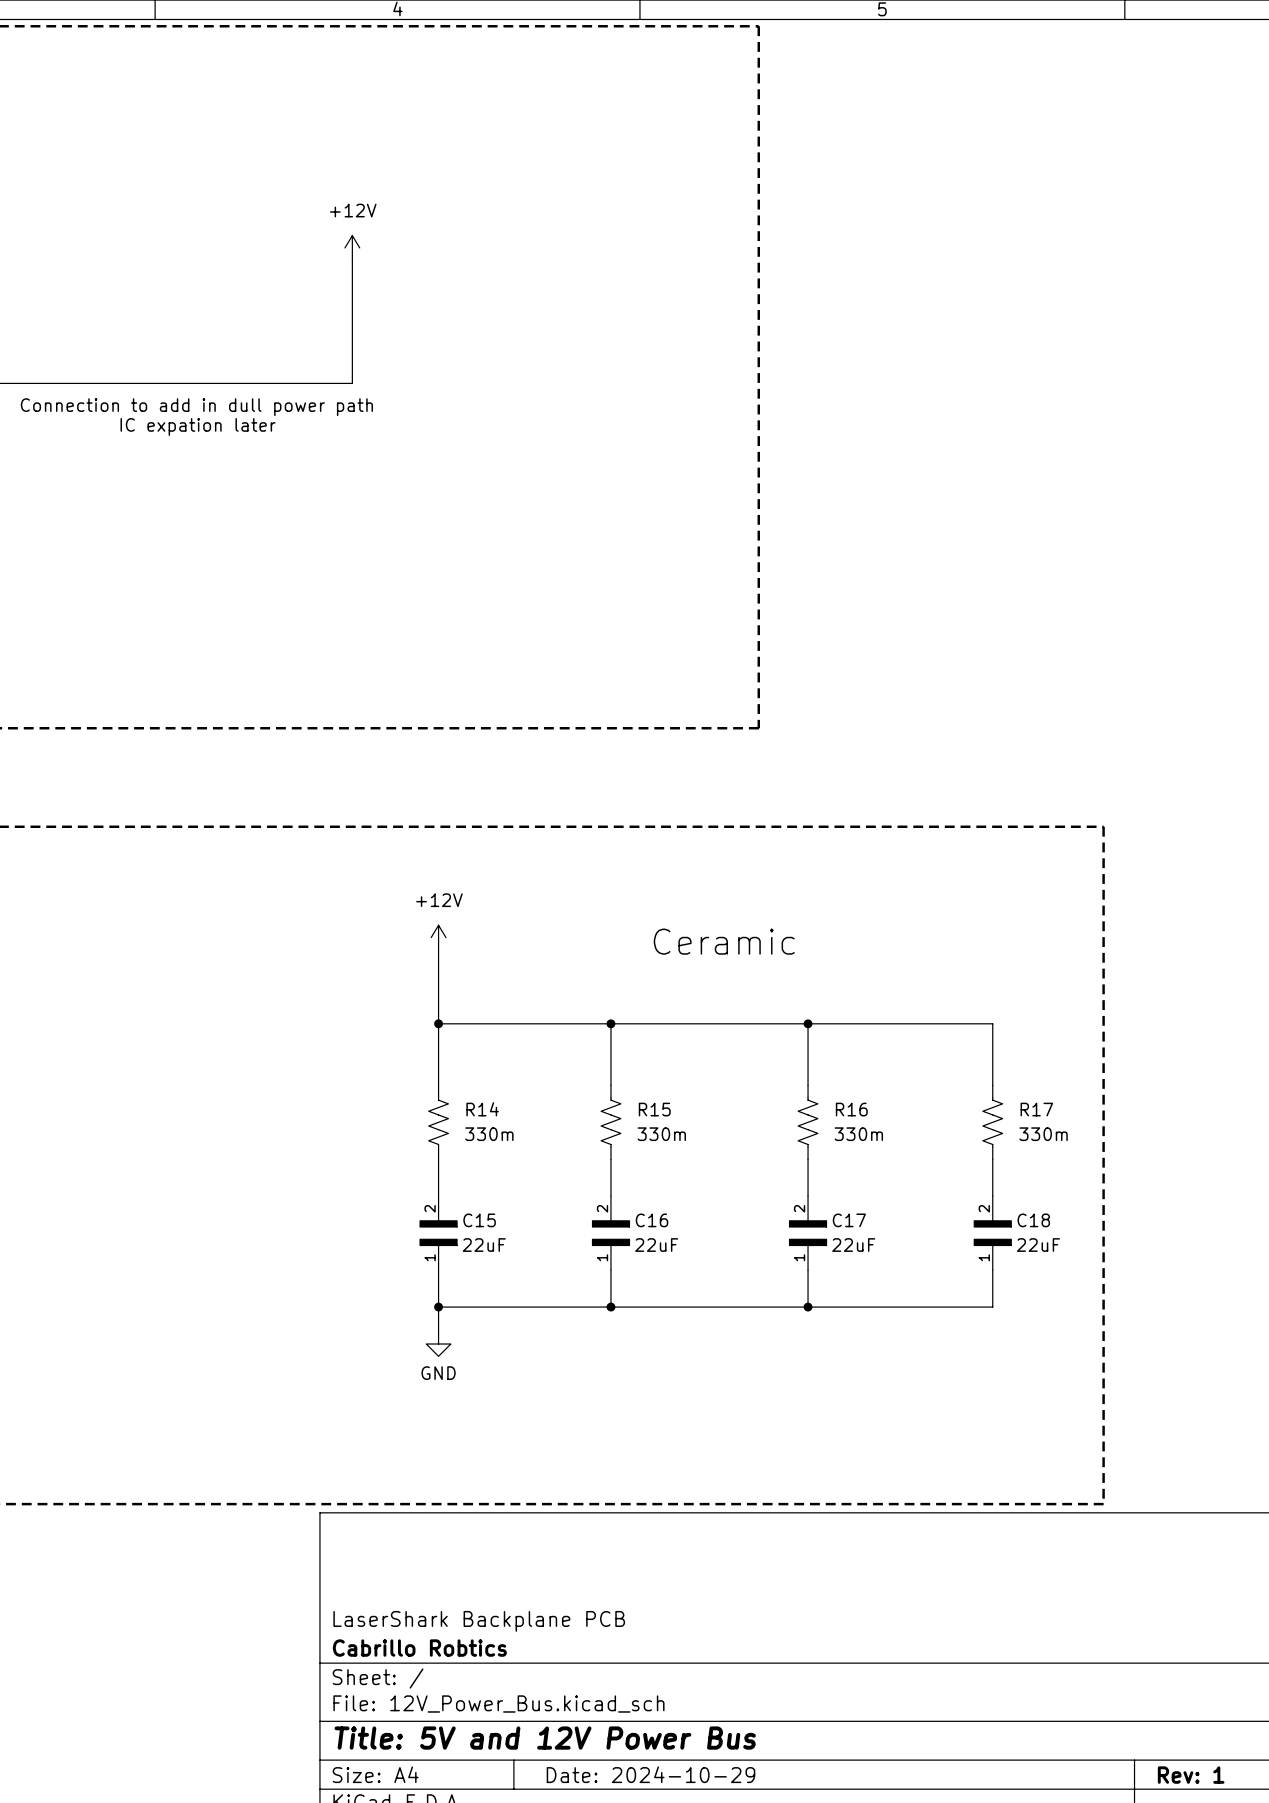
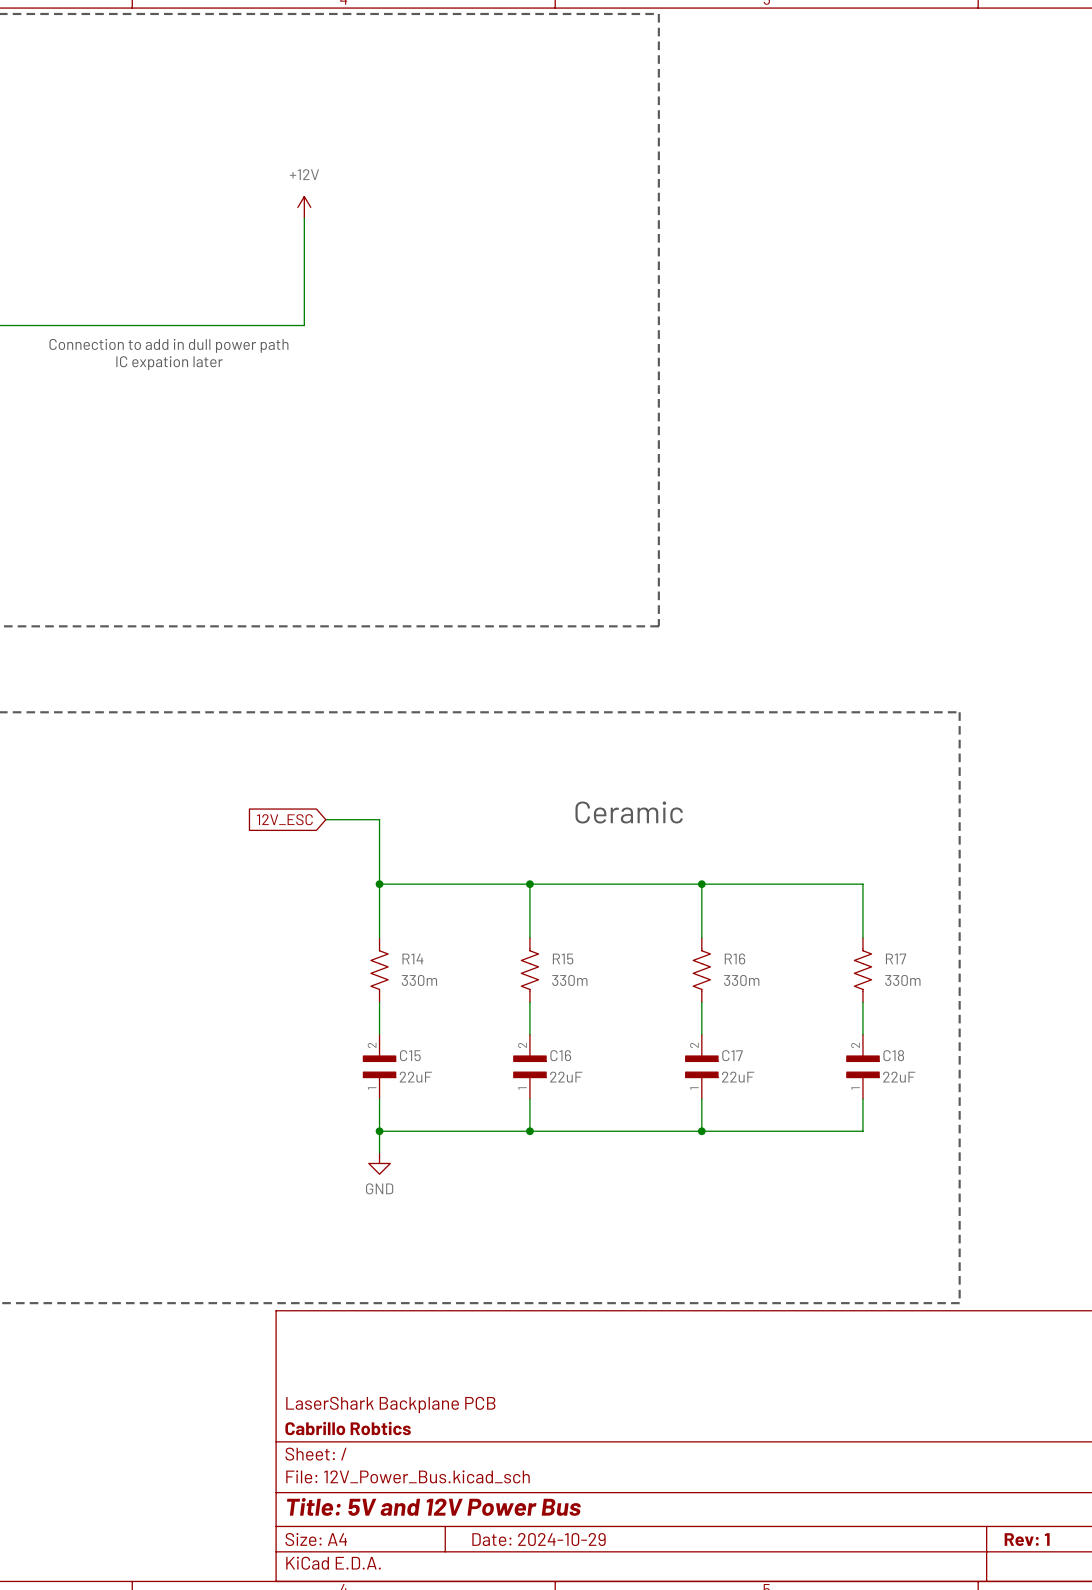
power symbol: +12V (438, 937) -> none
wire: none -> (325, 819) (379, 819)
global label: none -> 12V_ESC (284, 819)

